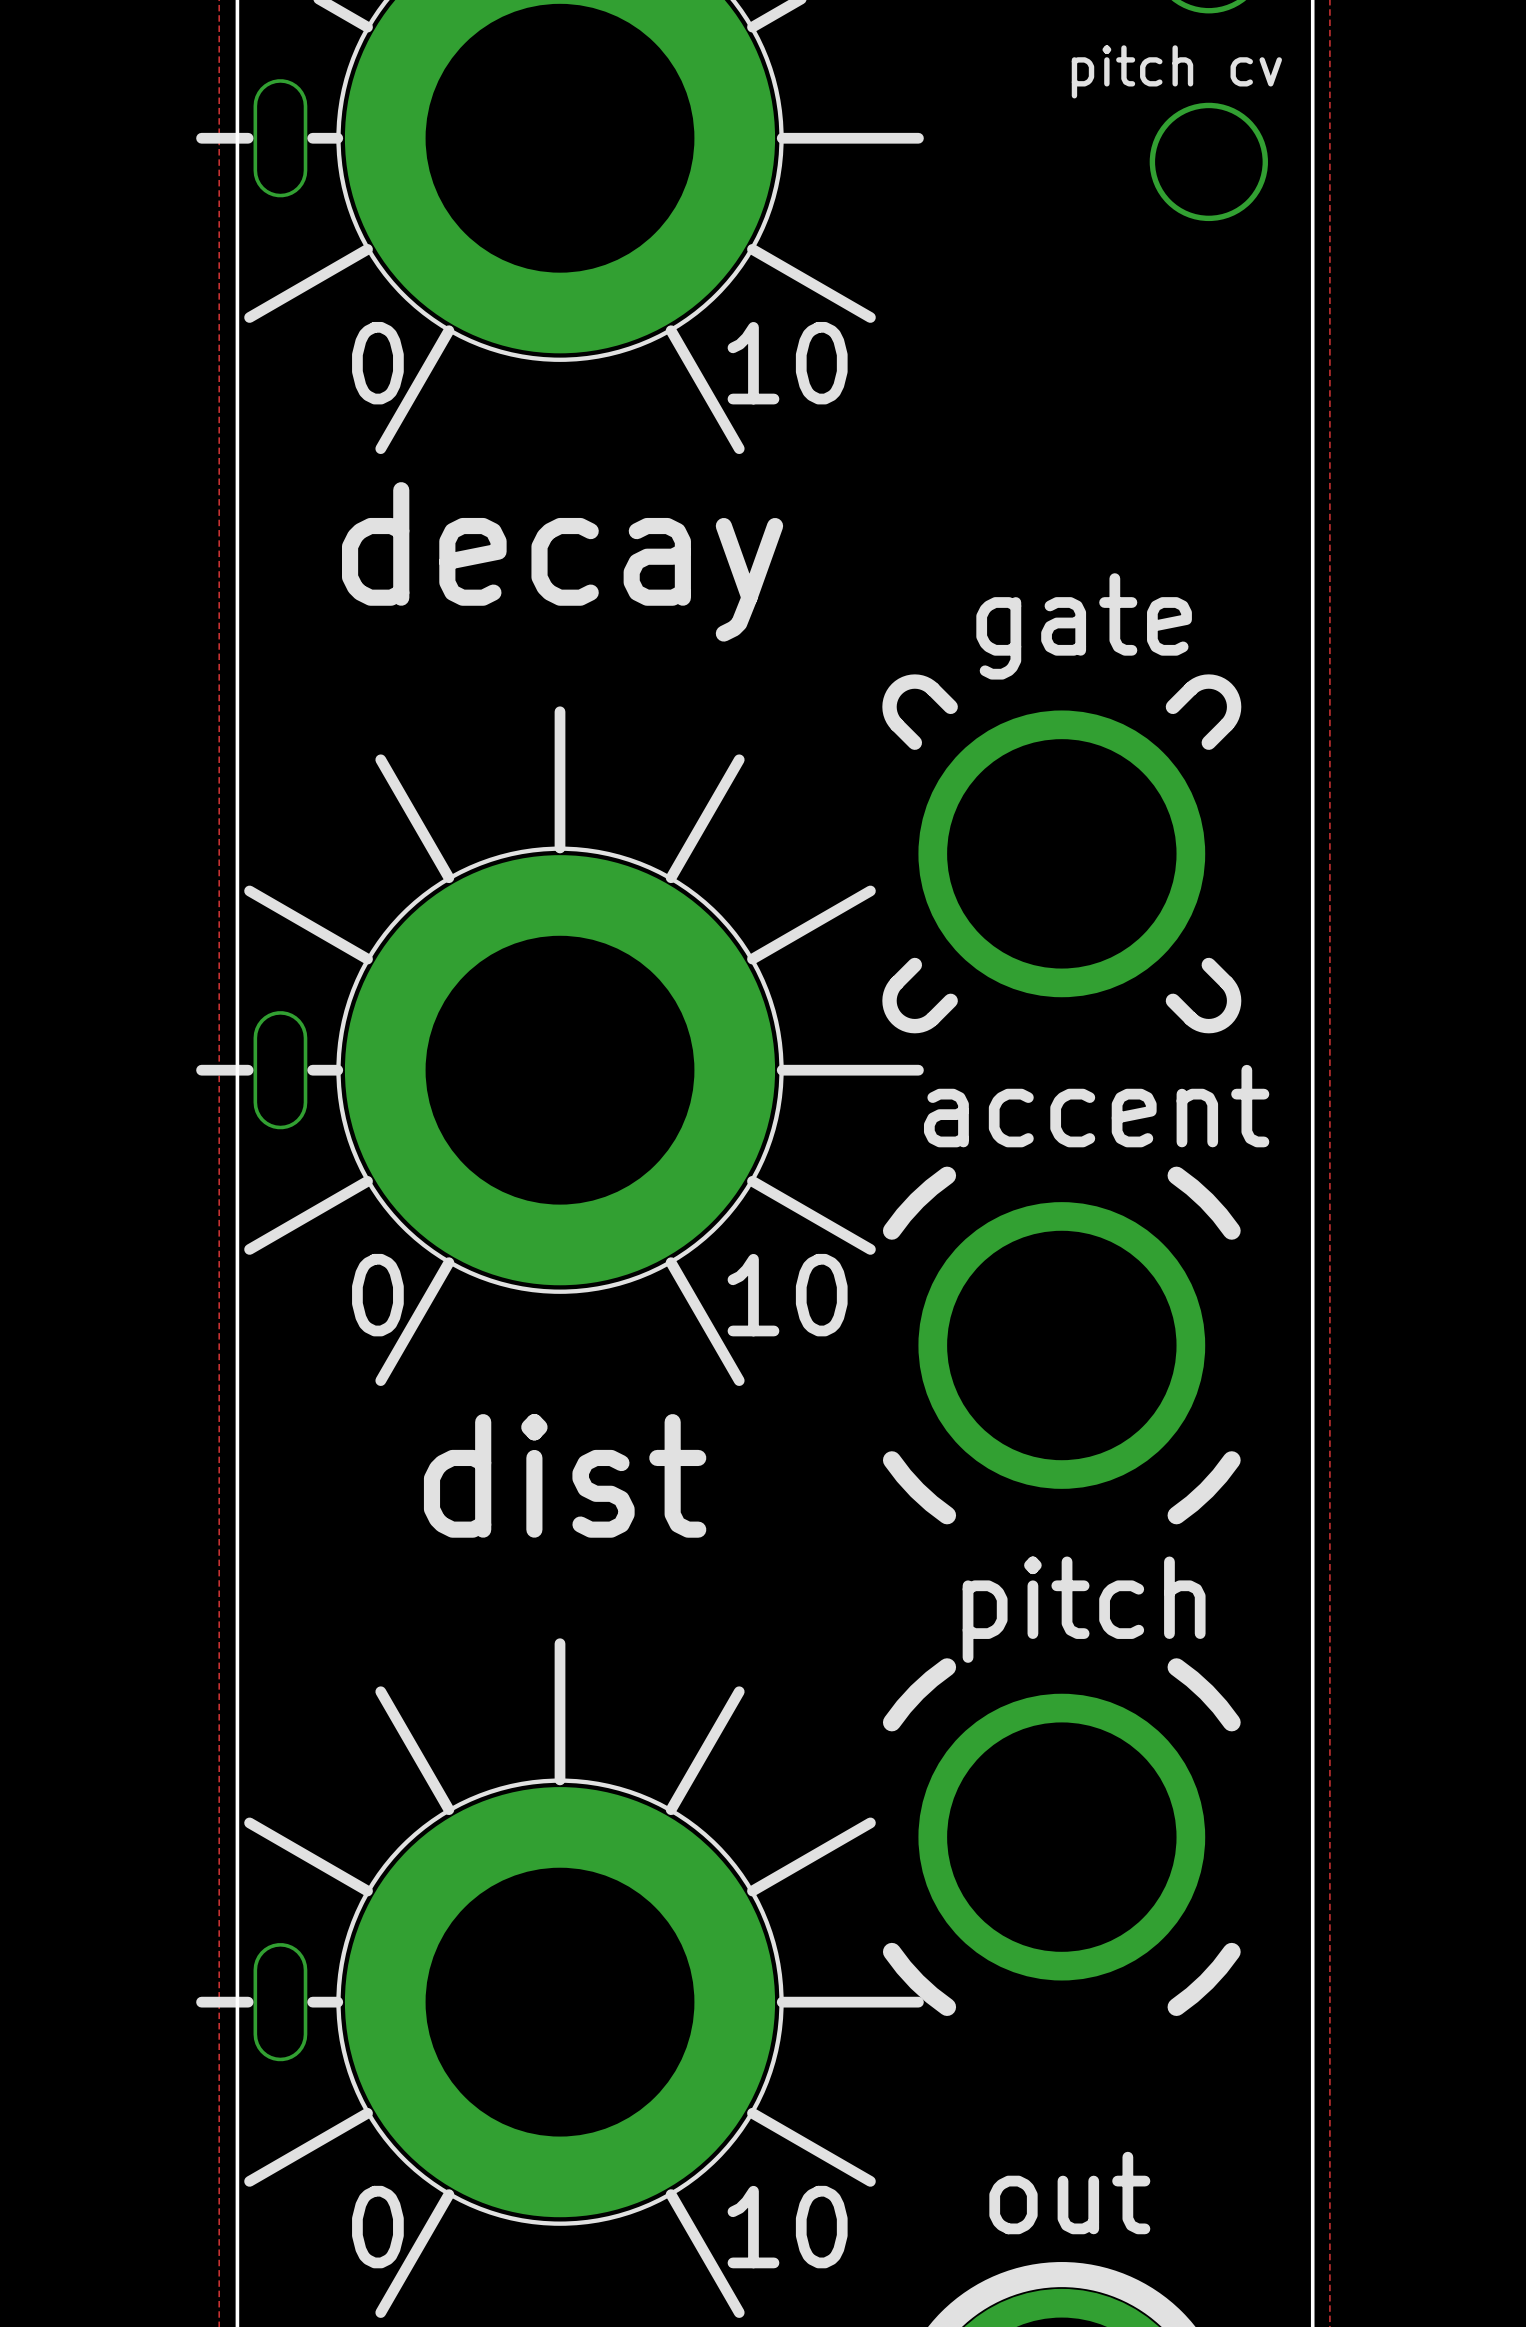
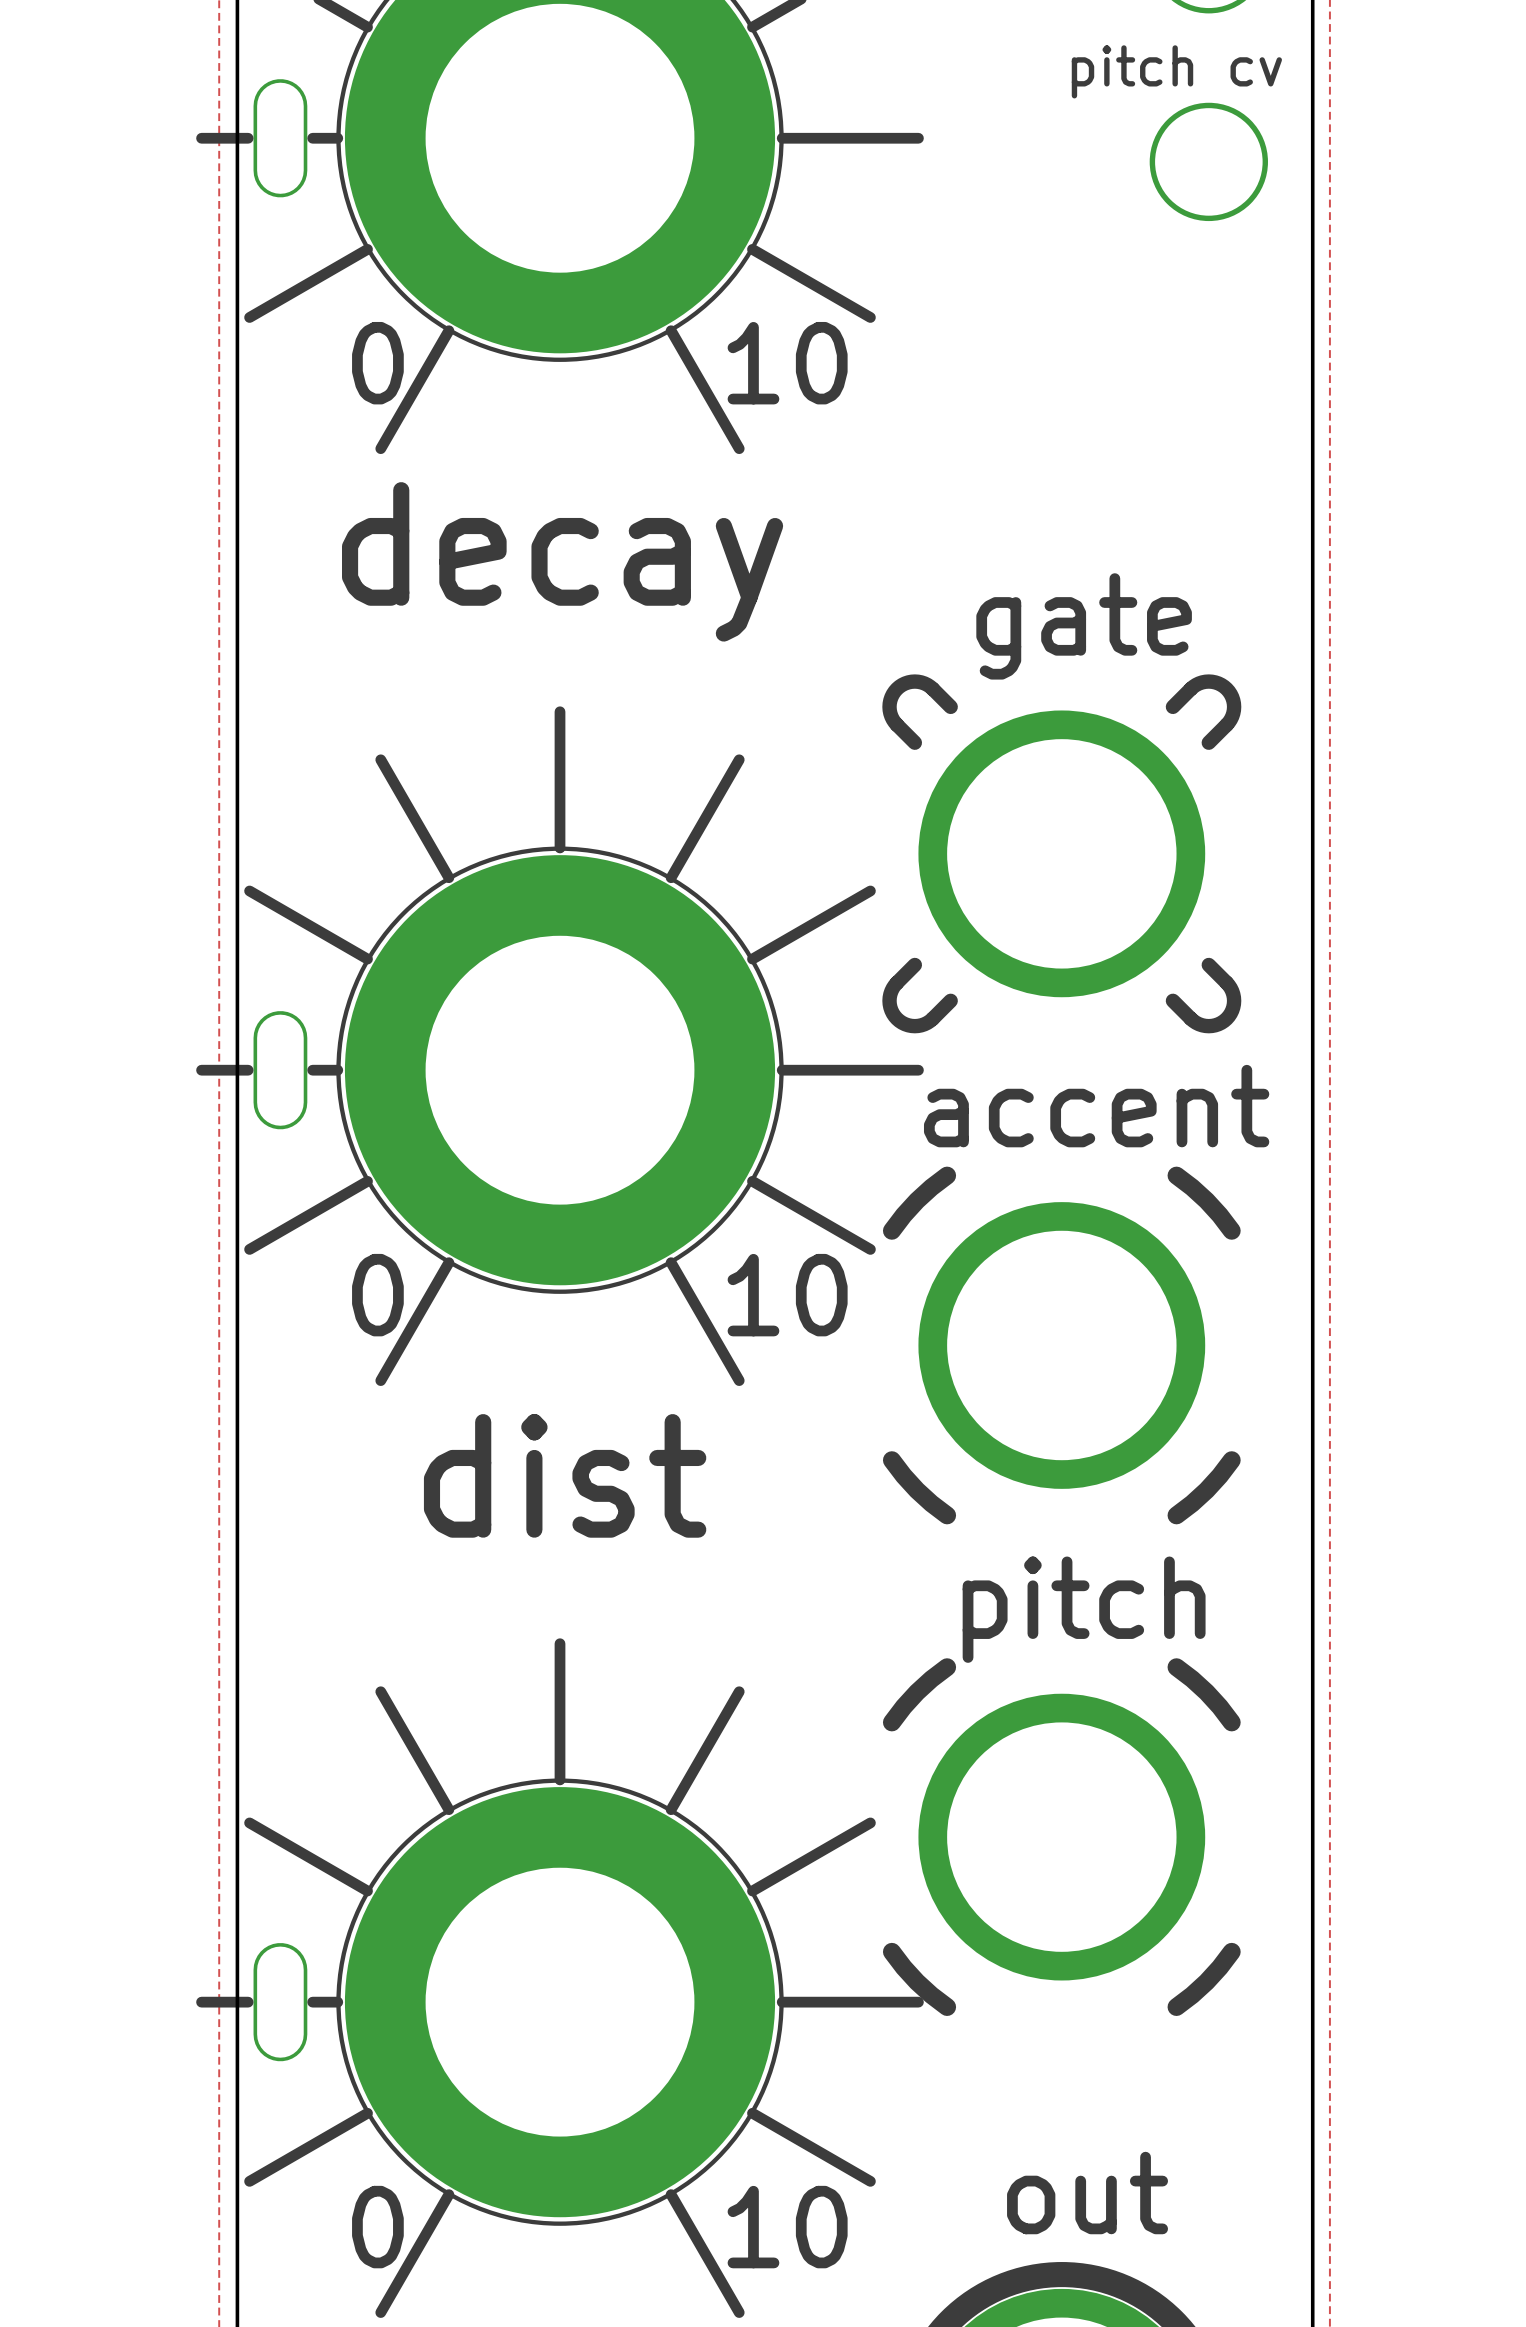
part value position: out (1069, 2193) -> out (1087, 2193)

